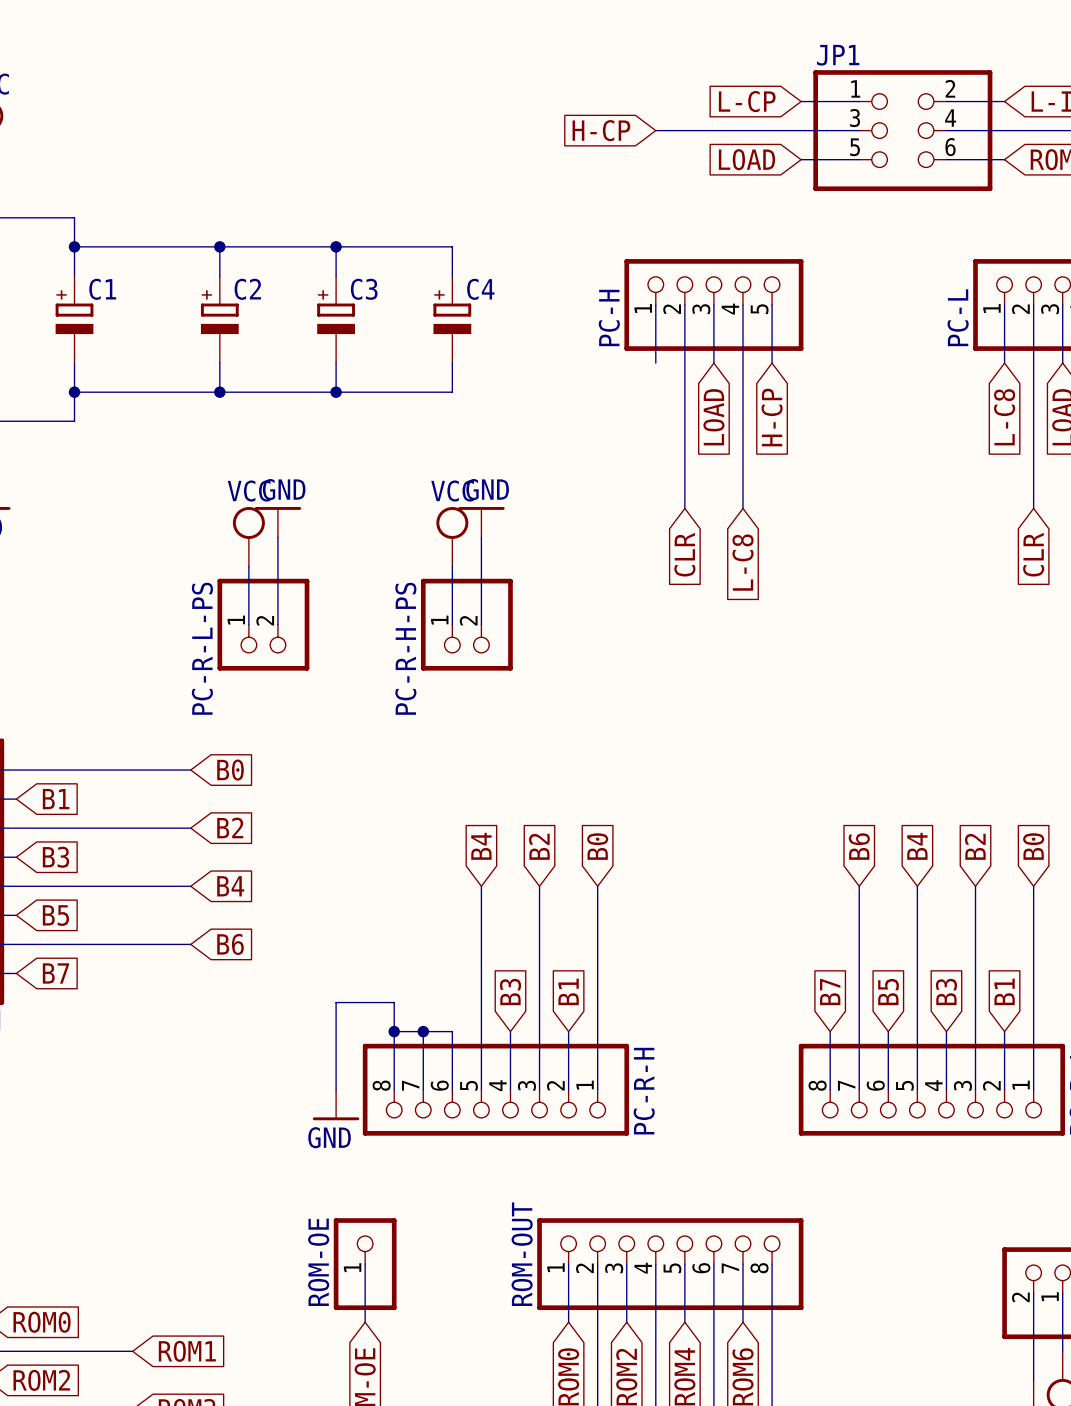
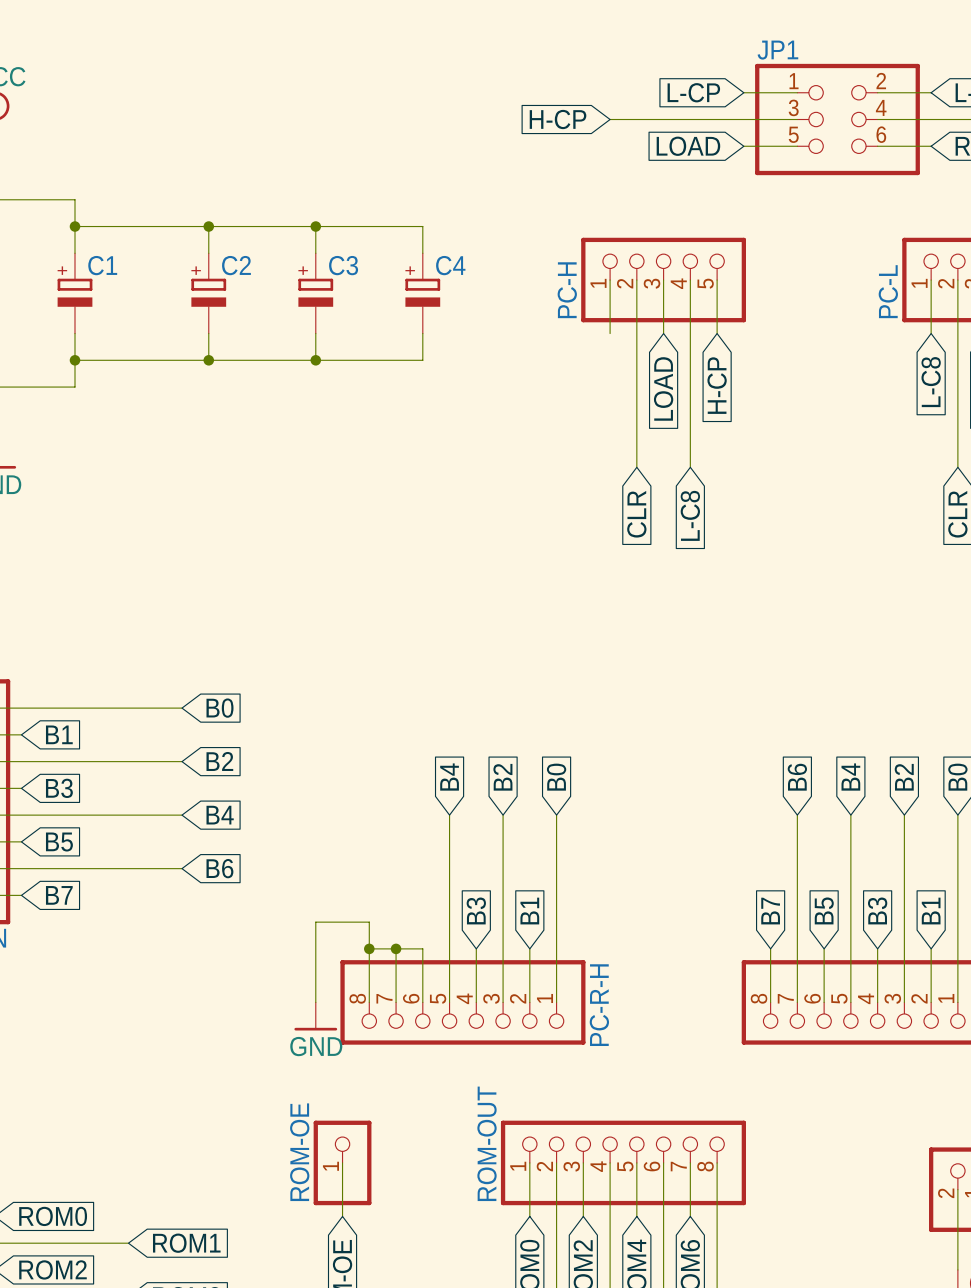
power symbol: GND (277, 522) -> none
power symbol: GND (481, 522) -> none
power symbol: VCC (248, 536) -> none
power symbol: VCC (452, 536) -> none
wire: (277, 537) (277, 624) -> none
wire: (481, 537) (481, 624) -> none
wire: (248, 566) (248, 624) -> none
wire: (452, 566) (452, 624) -> none
PC-R-L-PS: (263, 624) -> none
PC-R-H-PS: (466, 624) -> none

